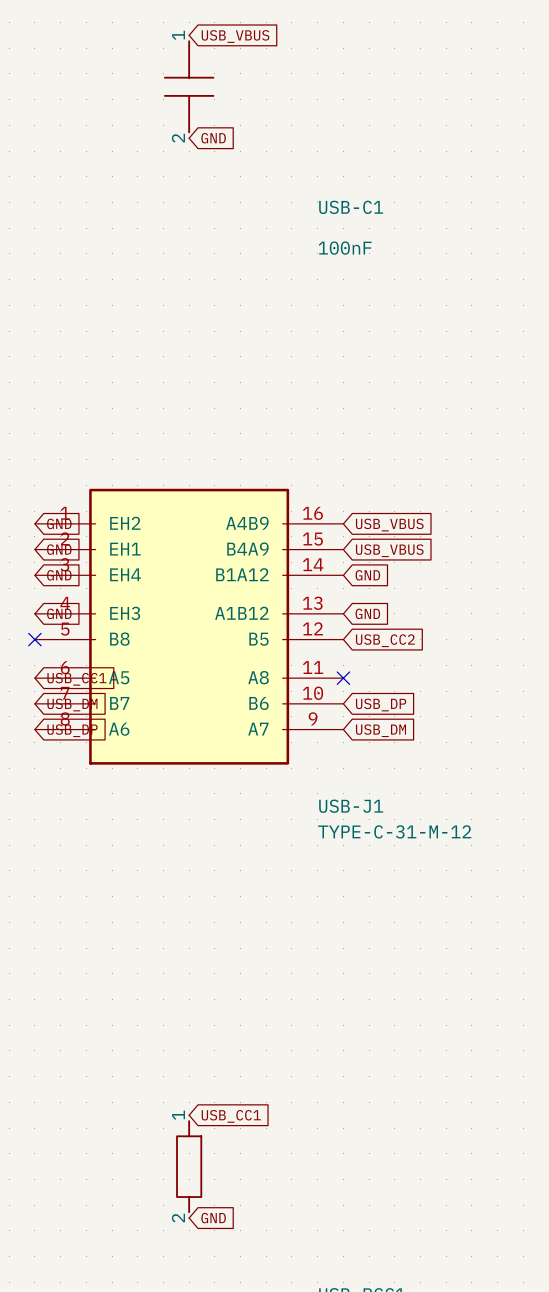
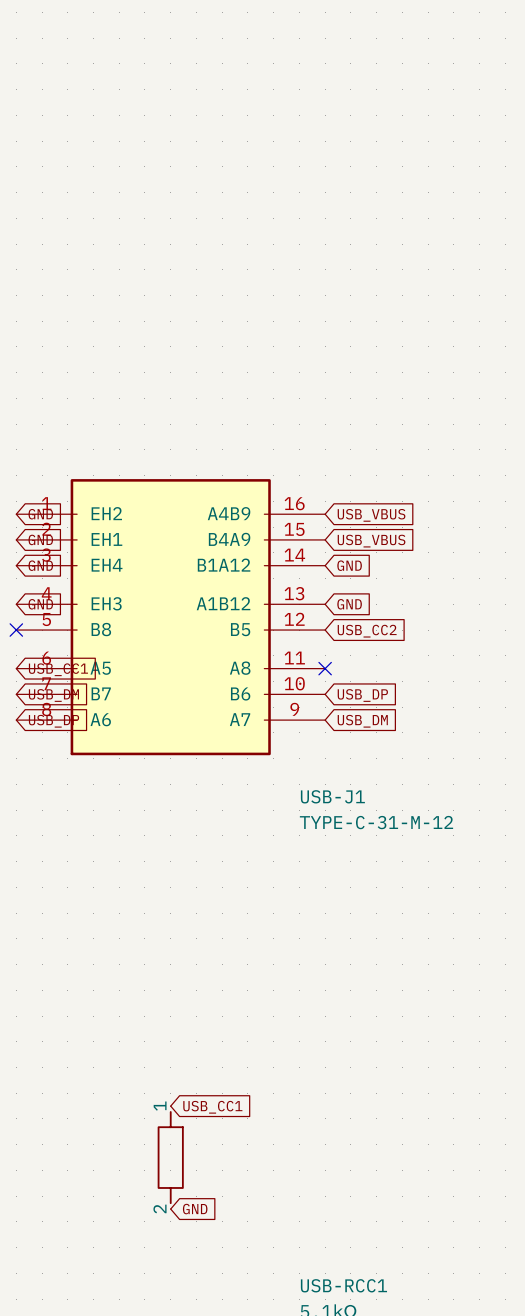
global label: USB_VBUS (235, 36) -> none
USB-C1: 100nF (189, 86) -> none
global label: GND (213, 138) -> none

